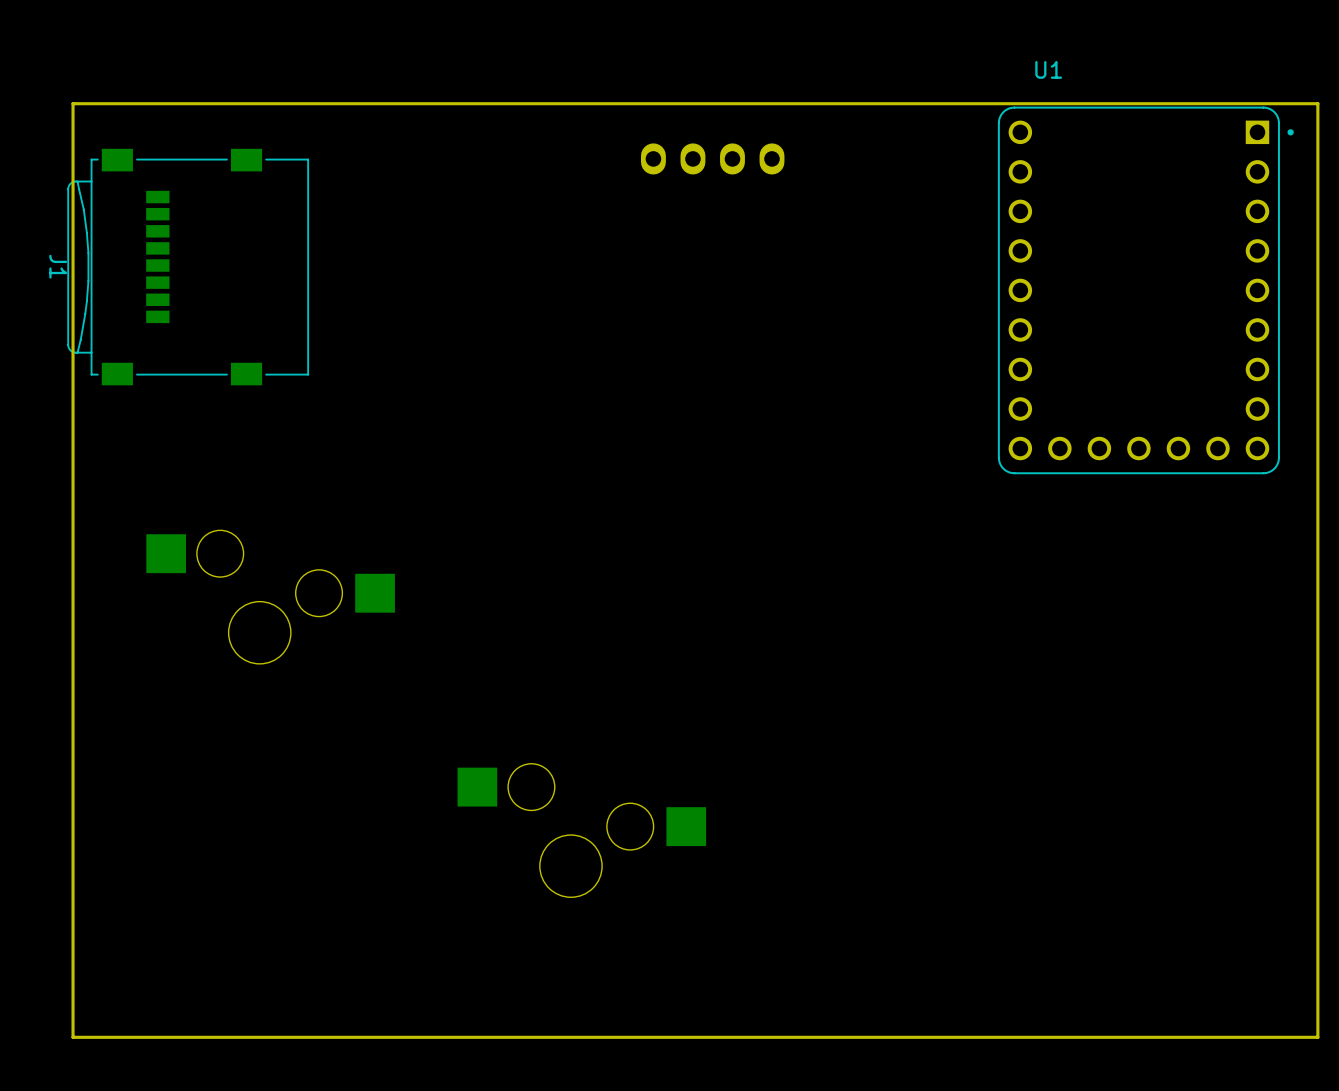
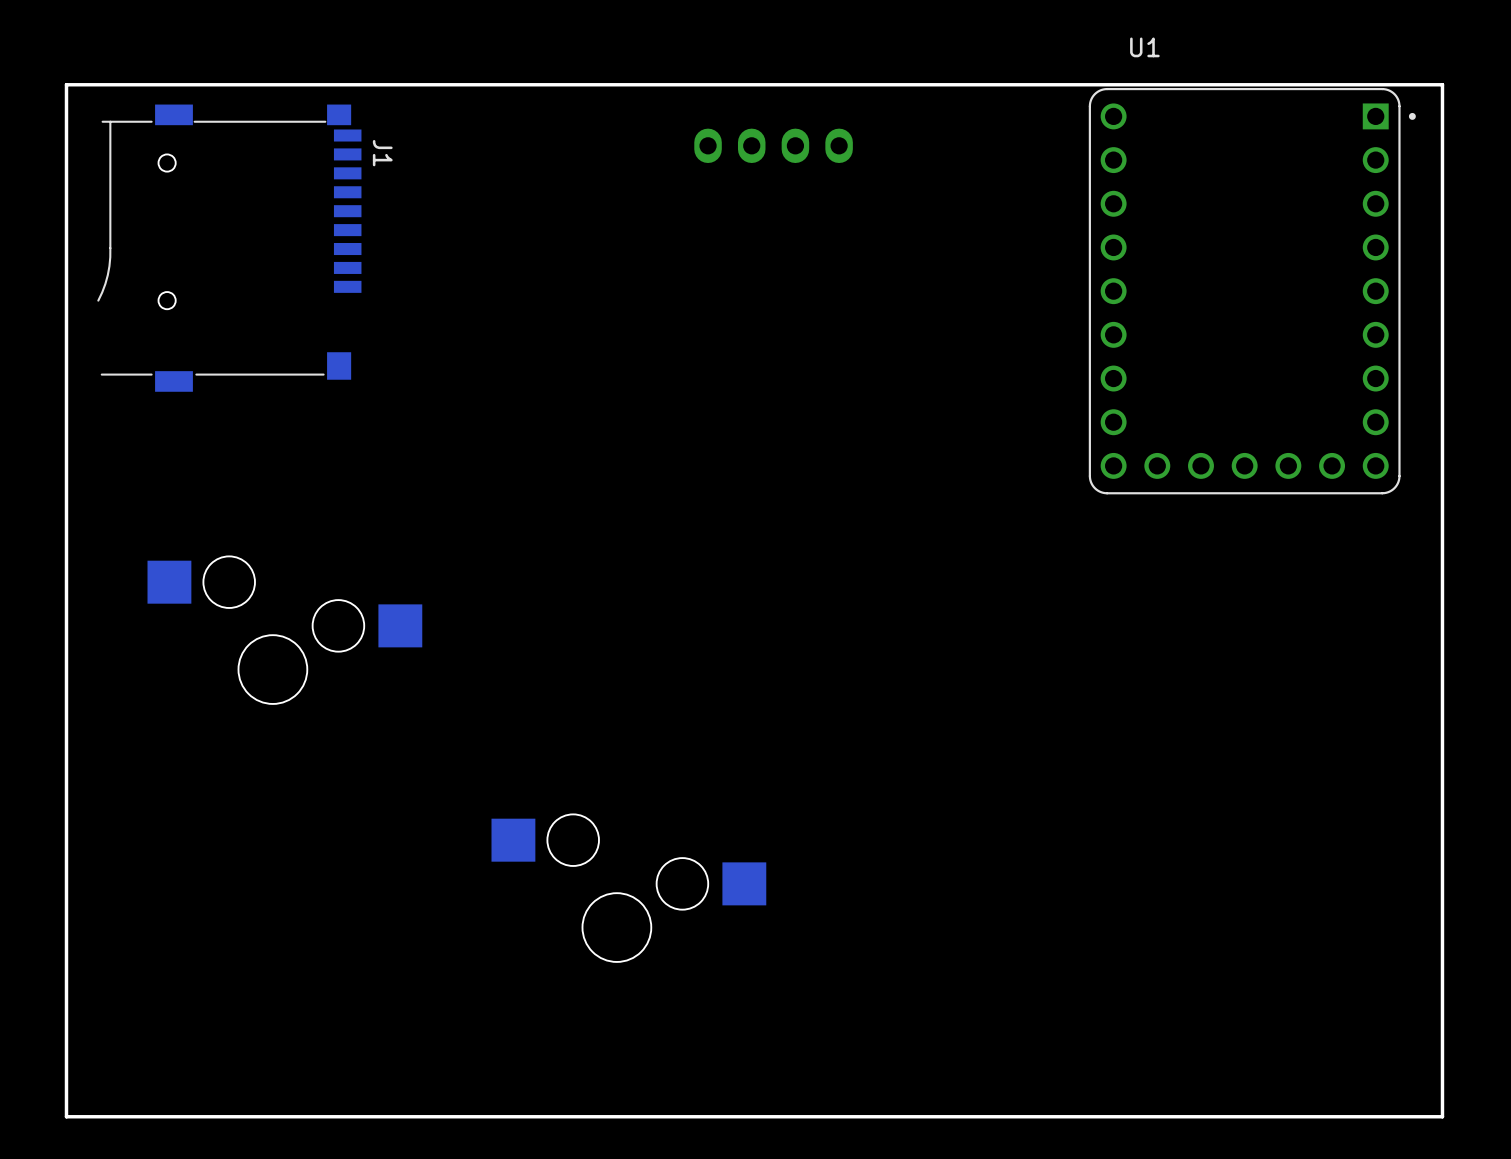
J1 footprint: [67, 148, 310, 386] -> [97, 104, 362, 392]
J1 name position: J1 (58, 266) -> J1 (382, 153)

